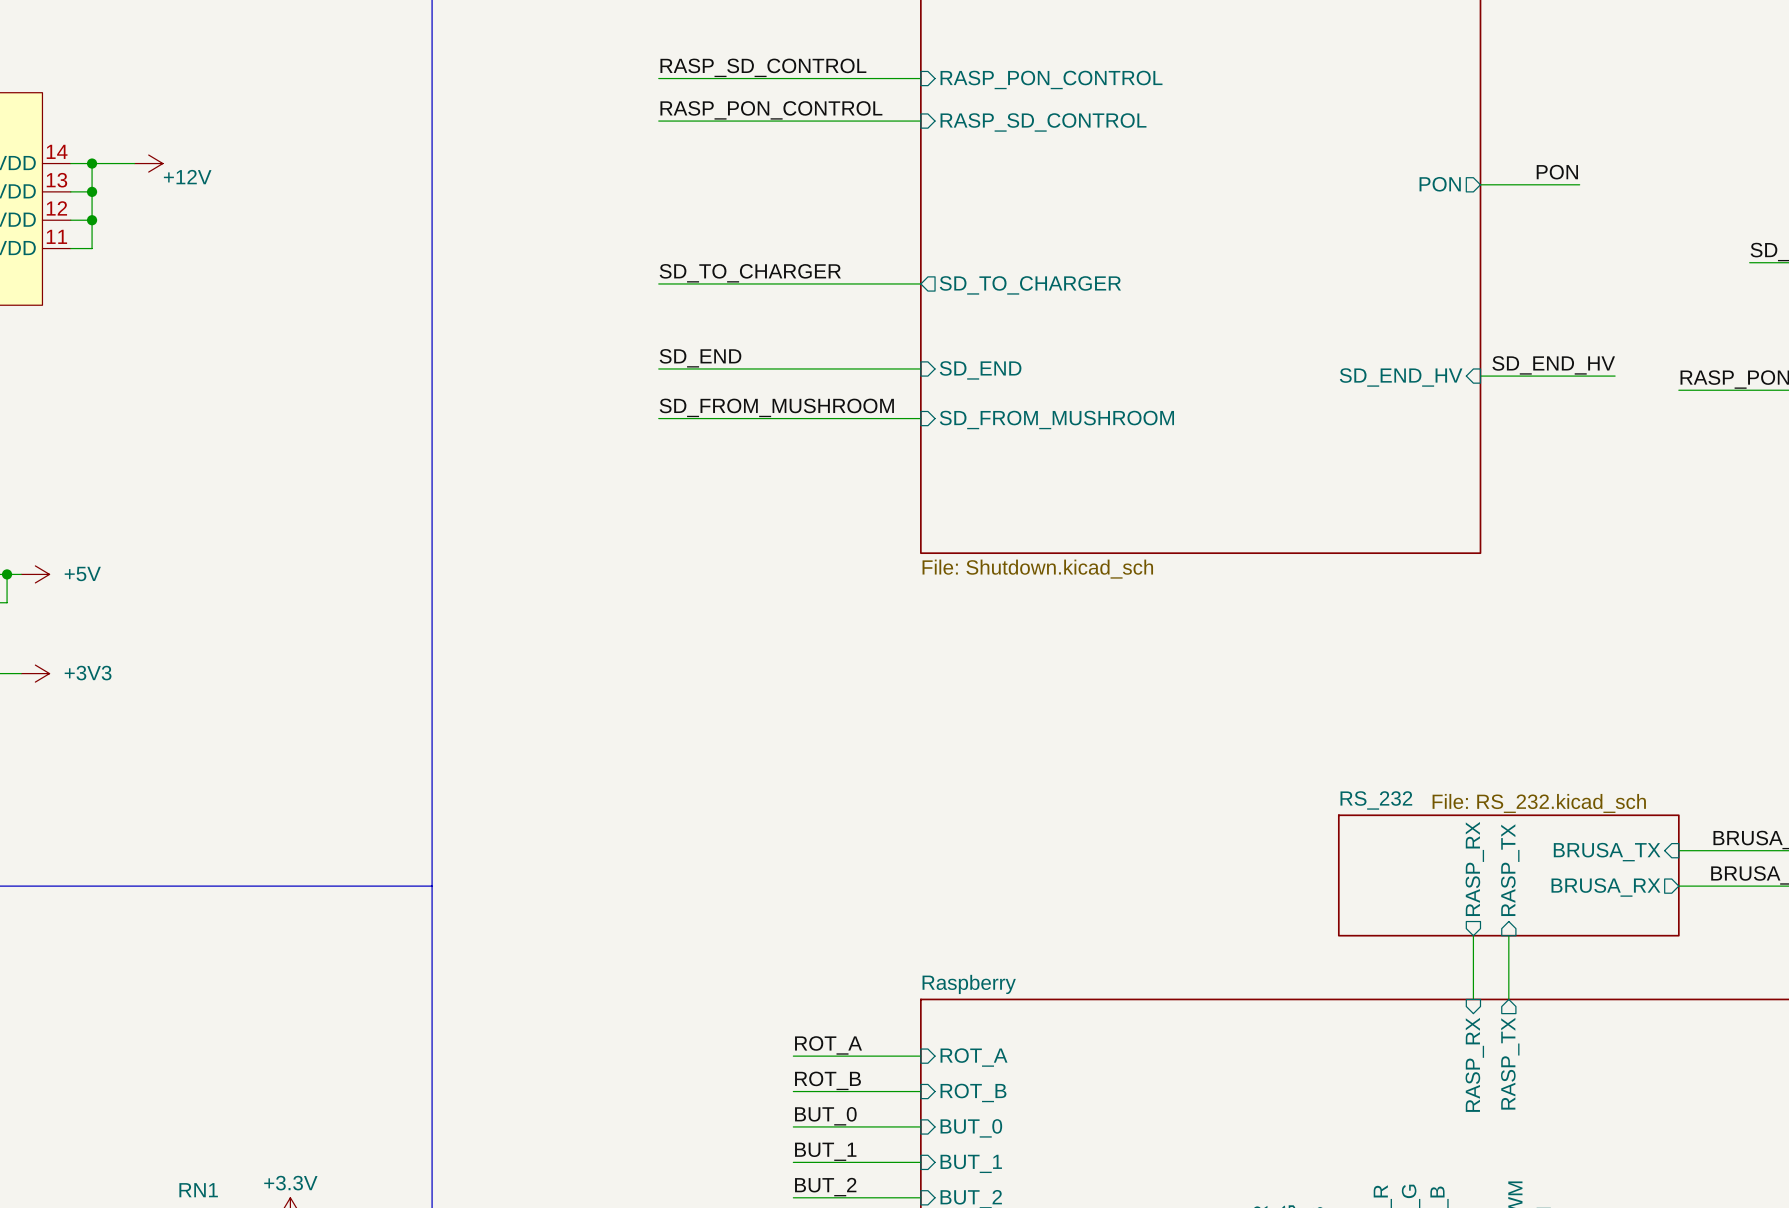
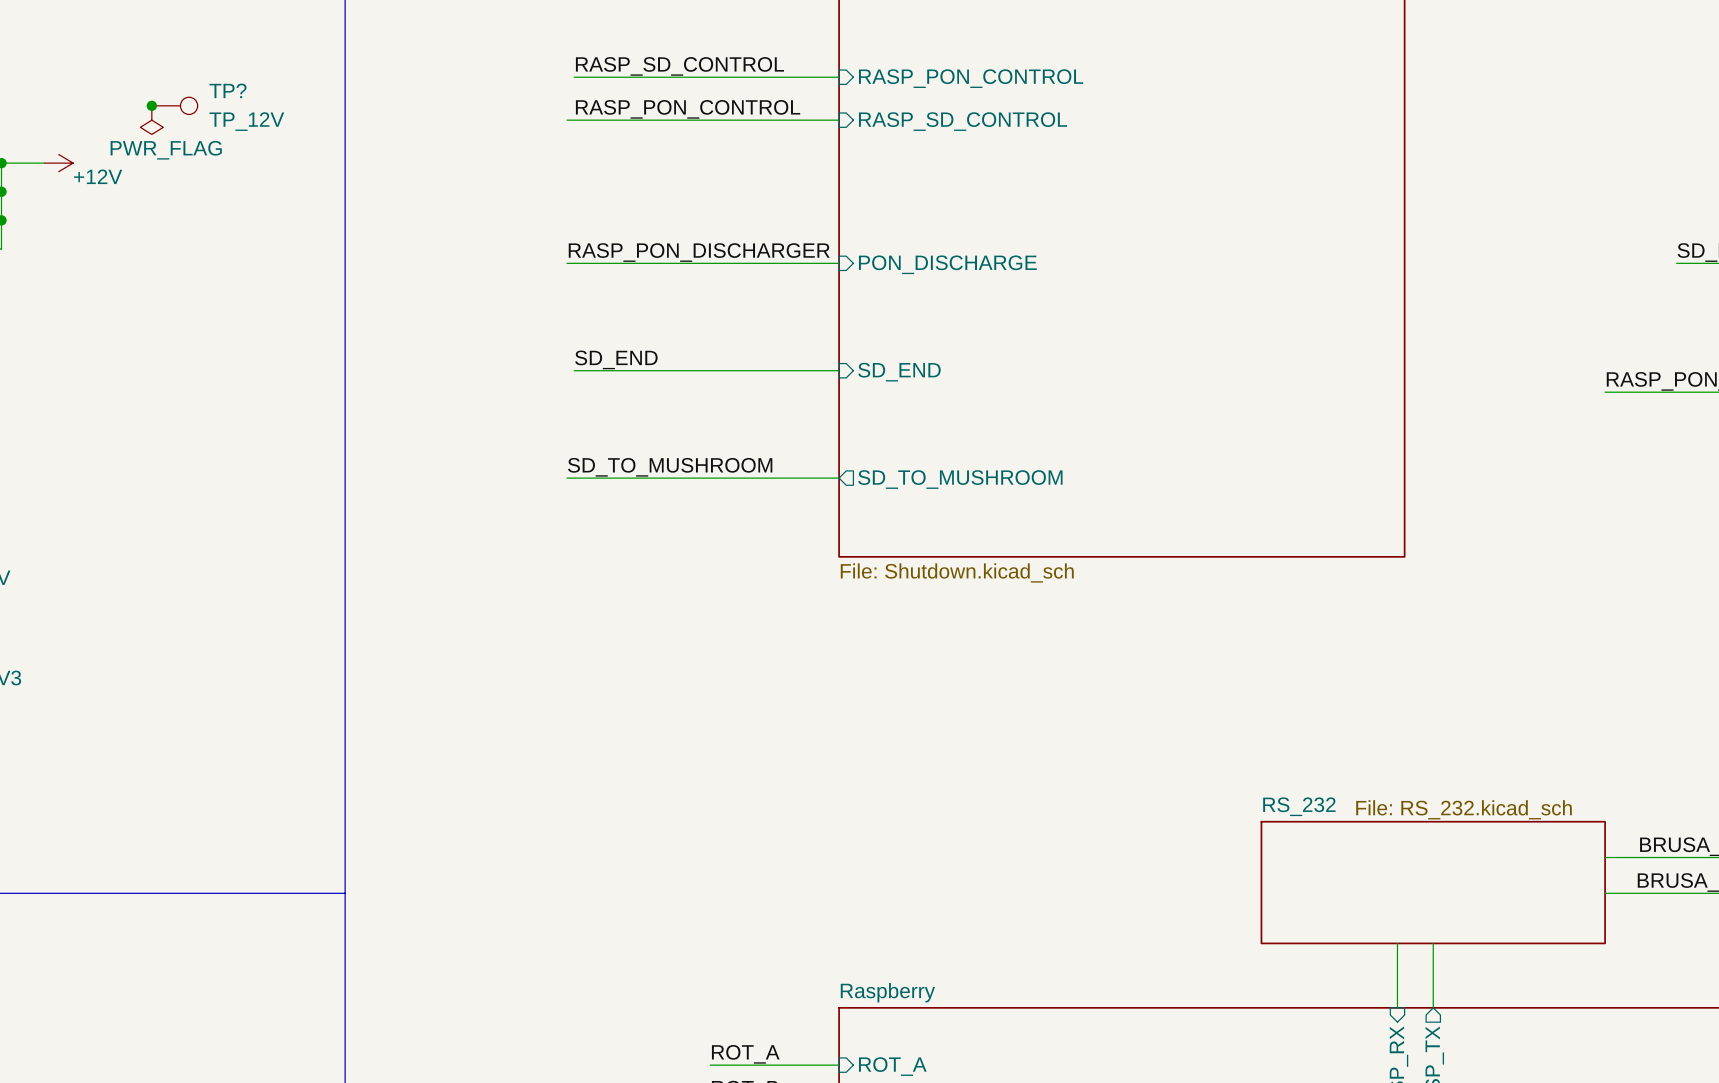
junction: none -> (151, 105)
TP?: none -> TP_12V (174, 105)
power symbol: none -> PWR_FLAG (151, 120)
wire: none -> (567, 120) (574, 120)
label: PON (1557, 172) -> none
sheet pin: PON (1440, 184) -> none
wire: (1480, 184) (1579, 184) -> none
label: none -> RASP_PON_DISCHARGER (699, 252)
wire: none -> (567, 263) (839, 263)
sheet pin: none -> PON_DISCHARGE (947, 264)
label: SD_TO_CHARGER (750, 273) -> none
wire: (658, 283) (920, 283) -> none
sheet pin: SD_TO_CHARGER (1030, 285) -> none
label: SD_END_HV (1553, 365) -> none
wire: (1480, 376) (1615, 376) -> none
sheet pin: SD_END_HV (1401, 377) -> none
label: SD_FROM_MUSHROOM (776, 407) -> none
wire: (658, 418) (920, 418) -> none
sheet pin: SD_FROM_MUSHROOM (1056, 419) -> none
label: none -> SD_TO_MUSHROOM (670, 467)
wire: none -> (567, 478) (839, 478)
sheet pin: none -> SD_TO_MUSHROOM (960, 479)
sheet pin: BRUSA_TX (1607, 852) -> none
sheet pin: RASP_RX (1474, 869) -> none
sheet pin: RASP_TX (1510, 870) -> none
sheet pin: BRUSA_RX (1605, 887) -> none

